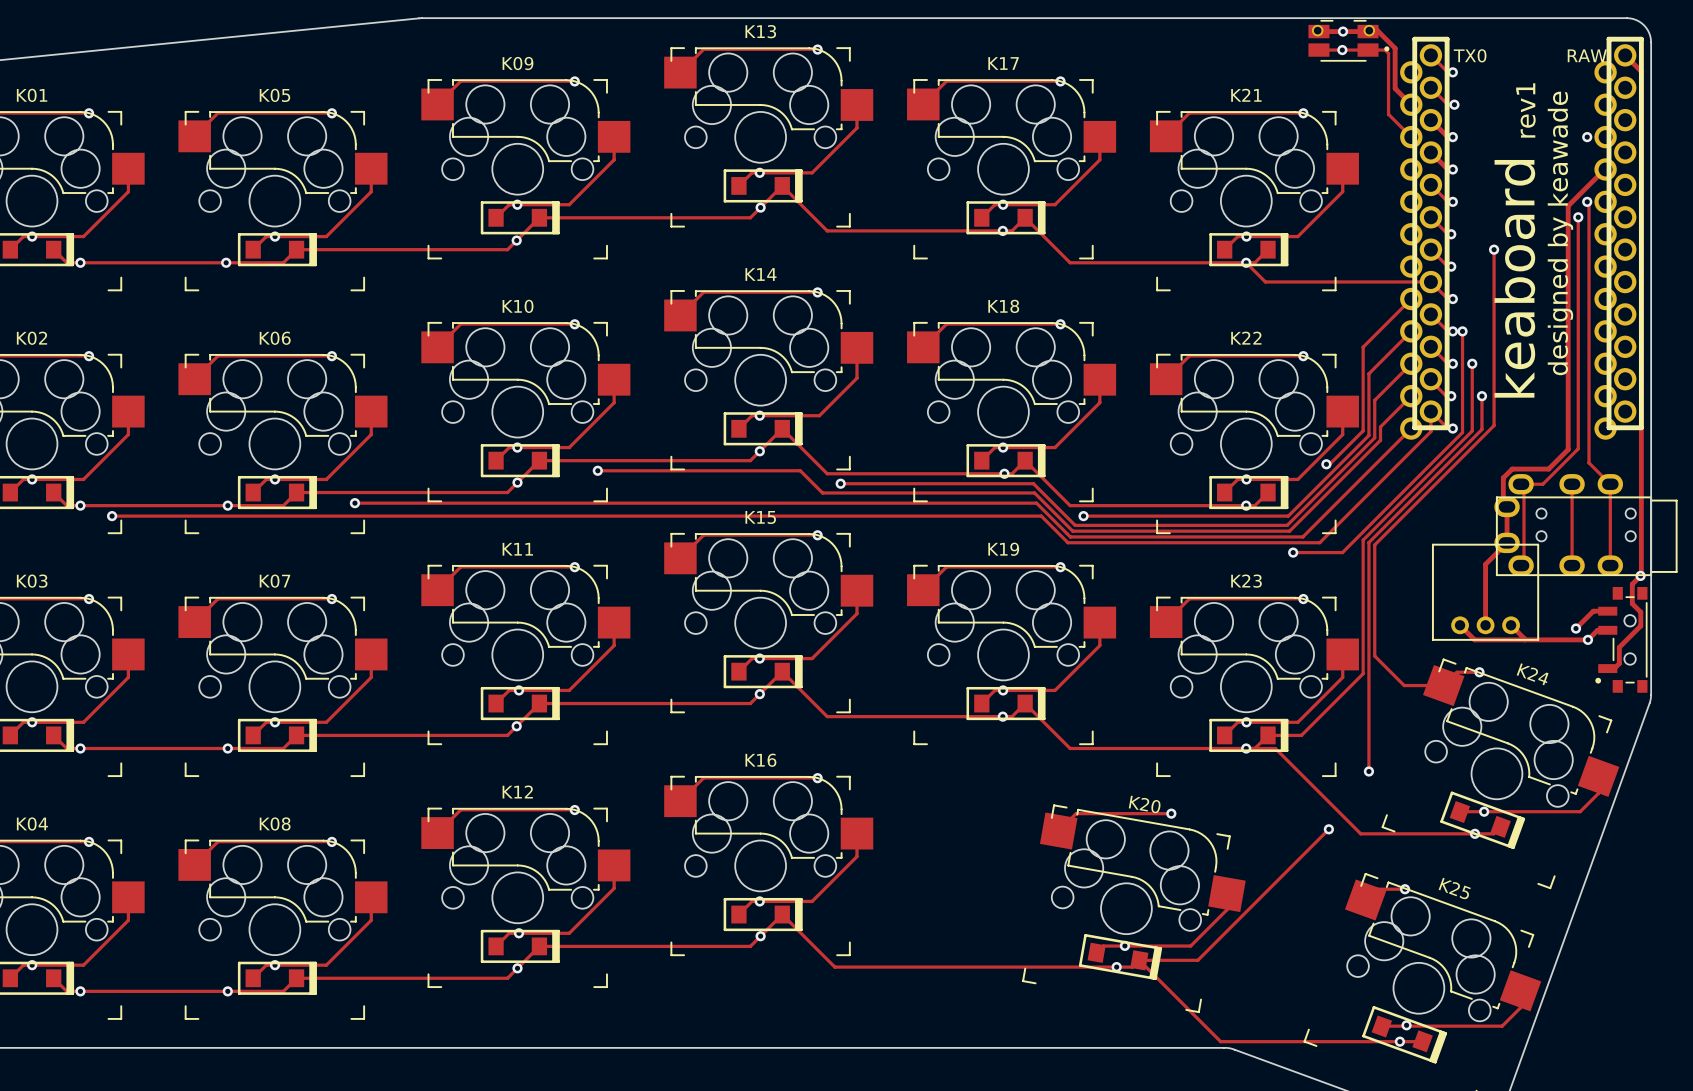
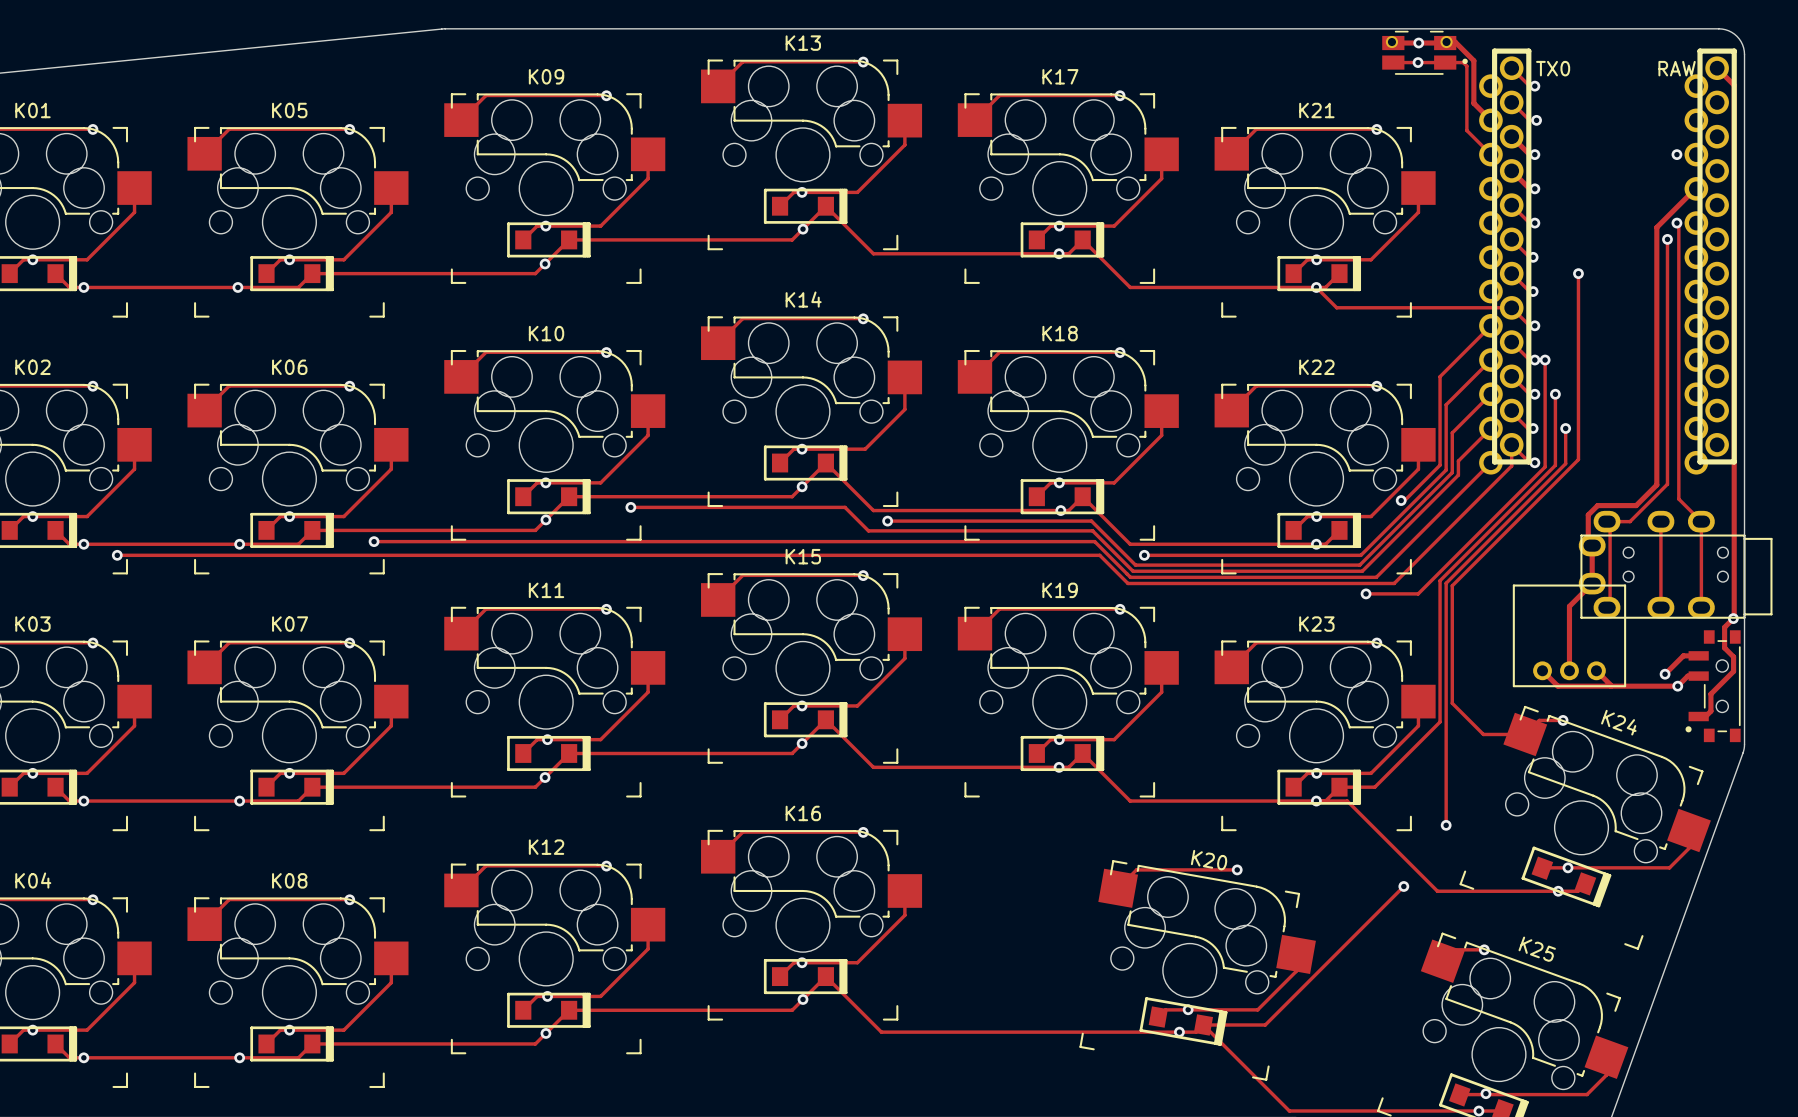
text: rev1 (1525, 110) -> none
text: designed by keawade (1560, 233) -> none
text: keaboard (1514, 278) -> none

